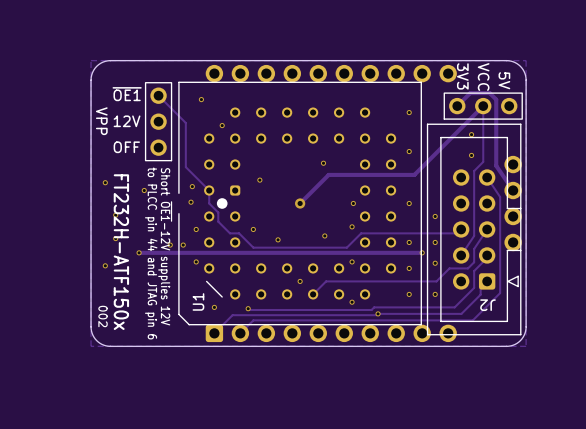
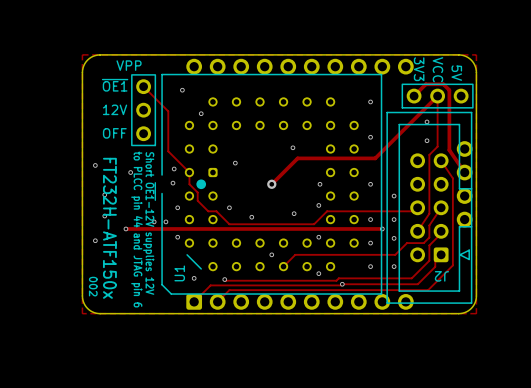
part value rotation: 0° (101, 121) -> 90° counterclockwise (129, 65)
part value position: VPP (101, 121) -> VPP (129, 65)

